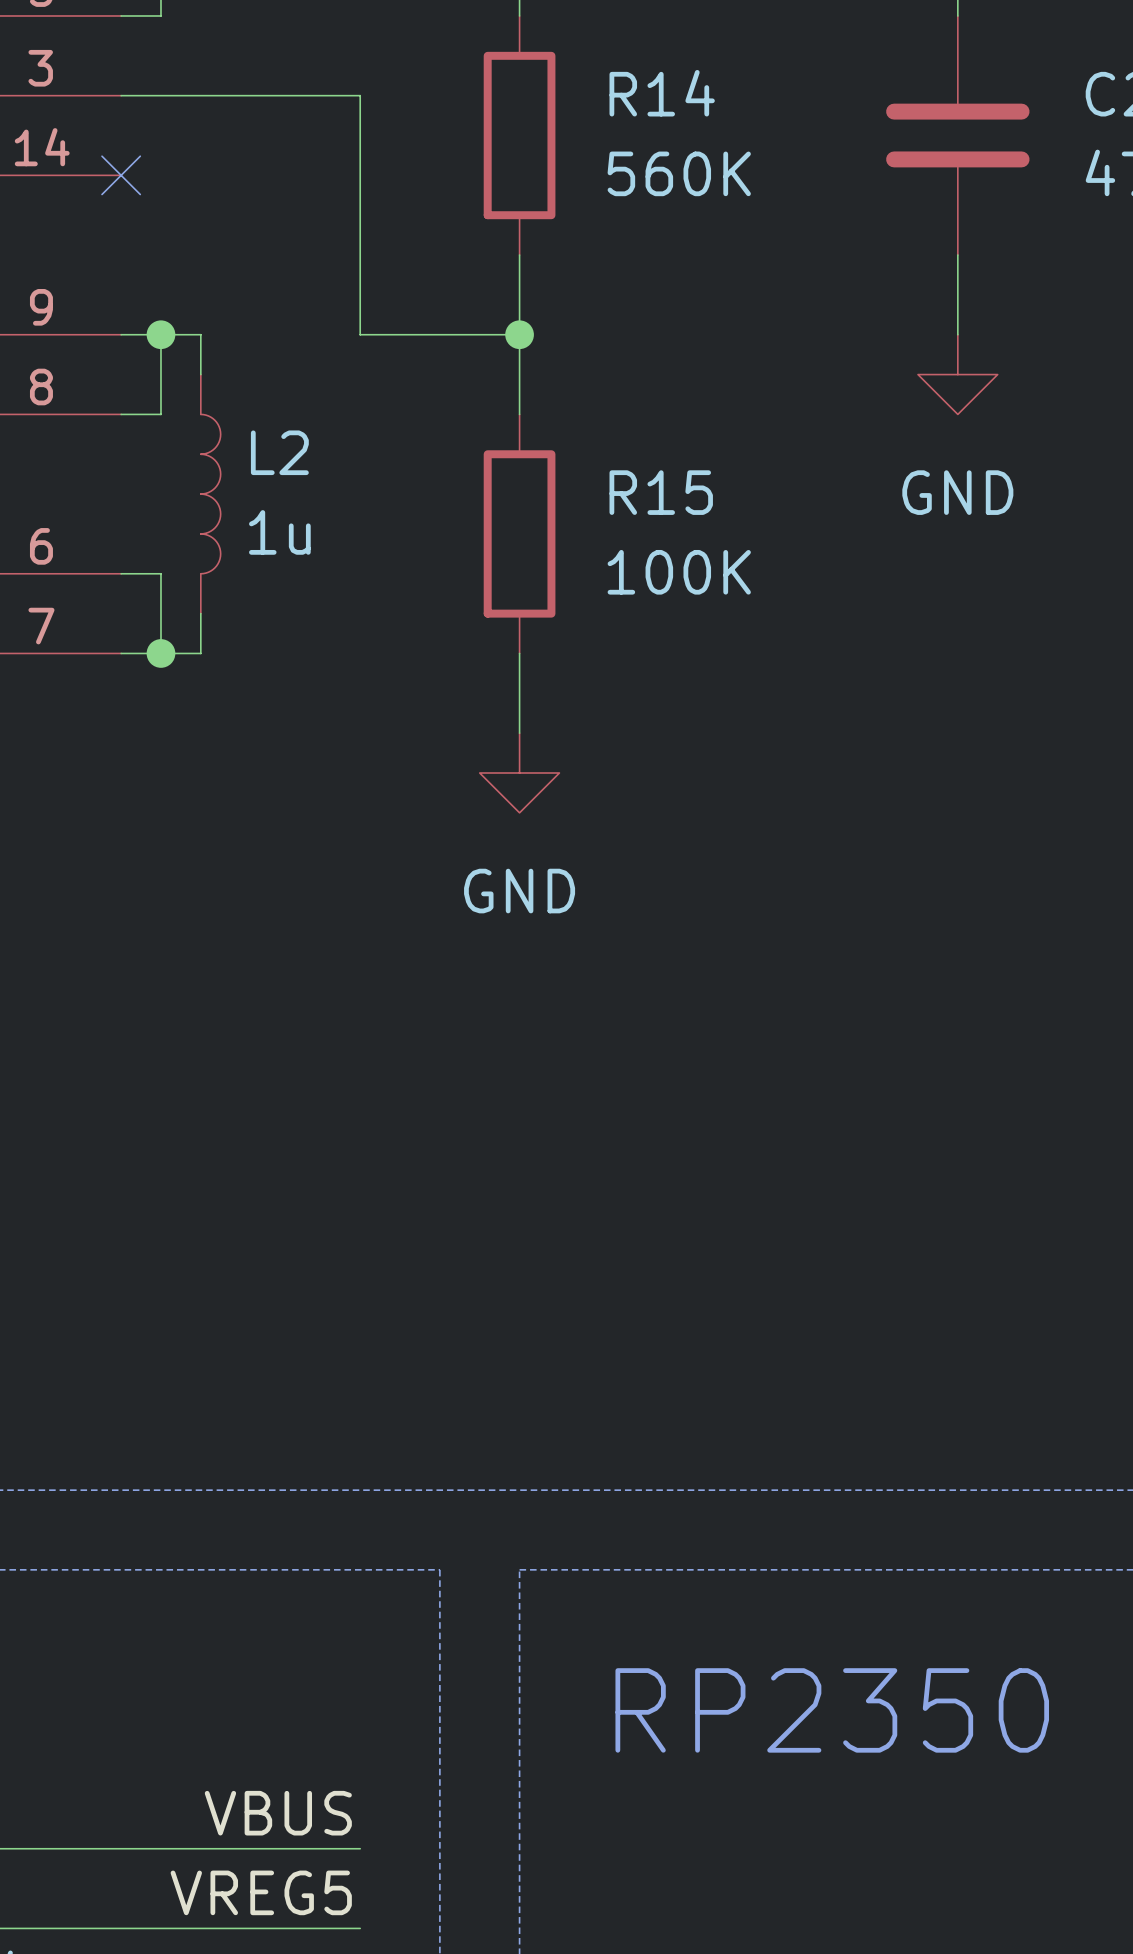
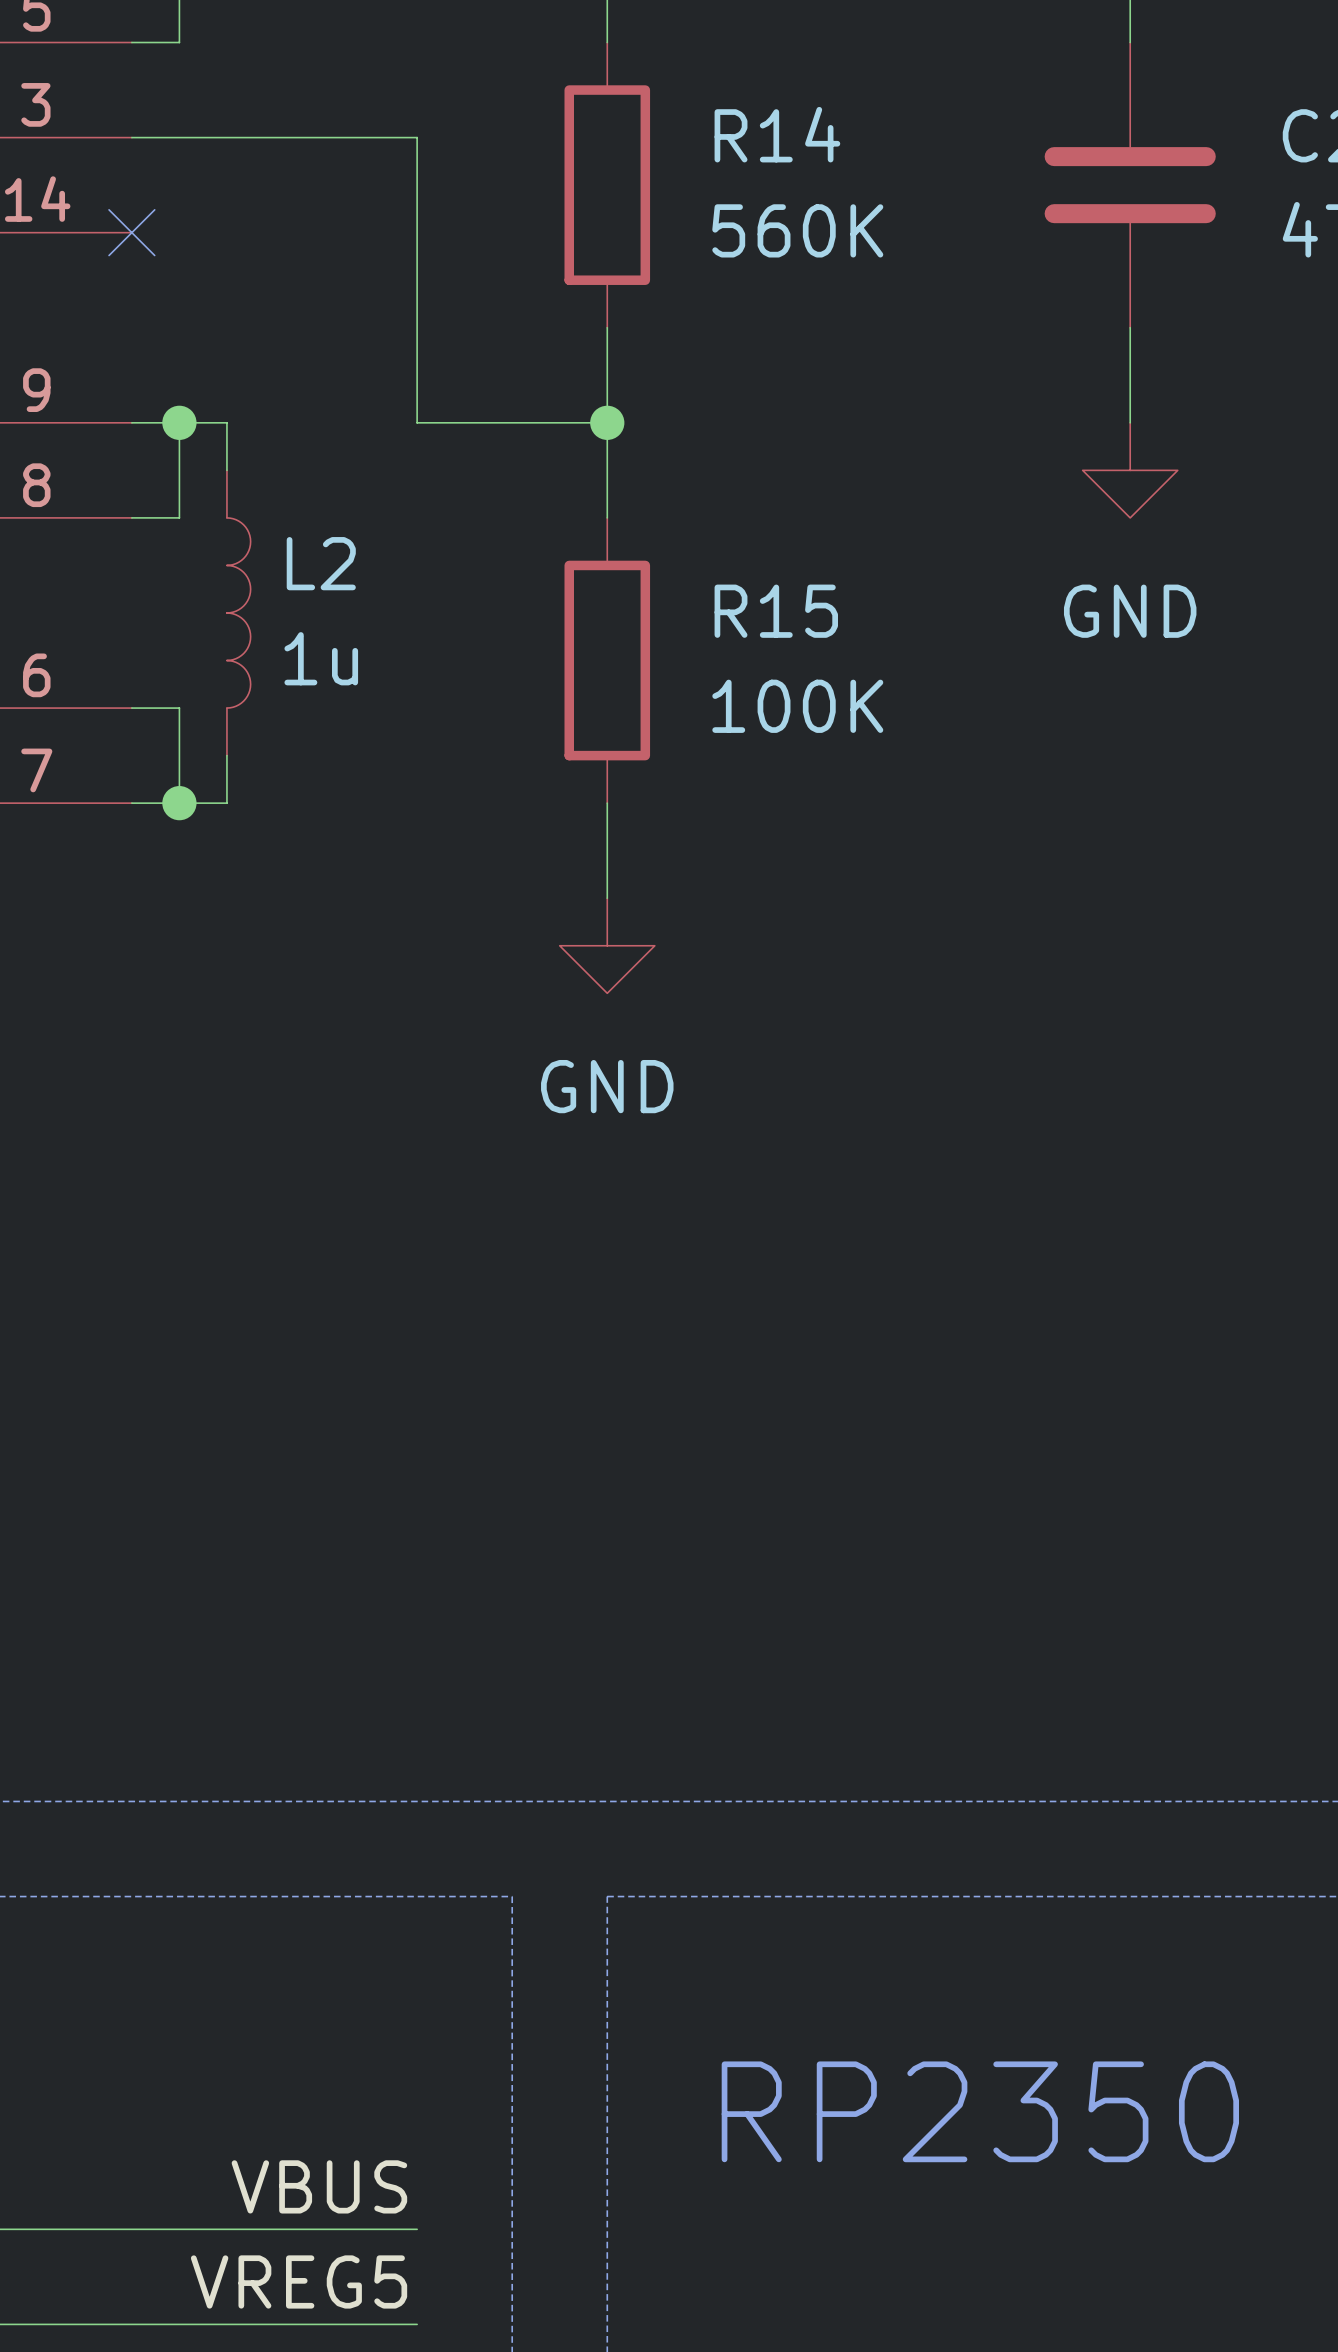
text position: RP2350 (832, 1710) -> RP2350 (980, 2111)

